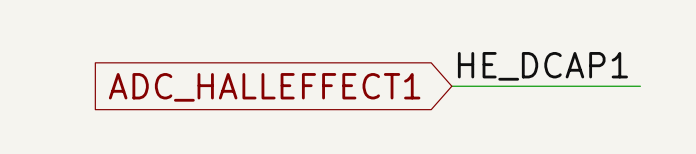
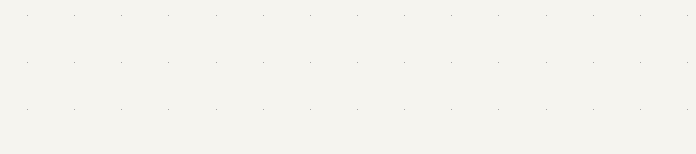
label: HE_DCAP1 (542, 66) -> none
wire: (451, 86) (640, 86) -> none
global label: ADC_HALLEFFECT1 (264, 87) -> none

